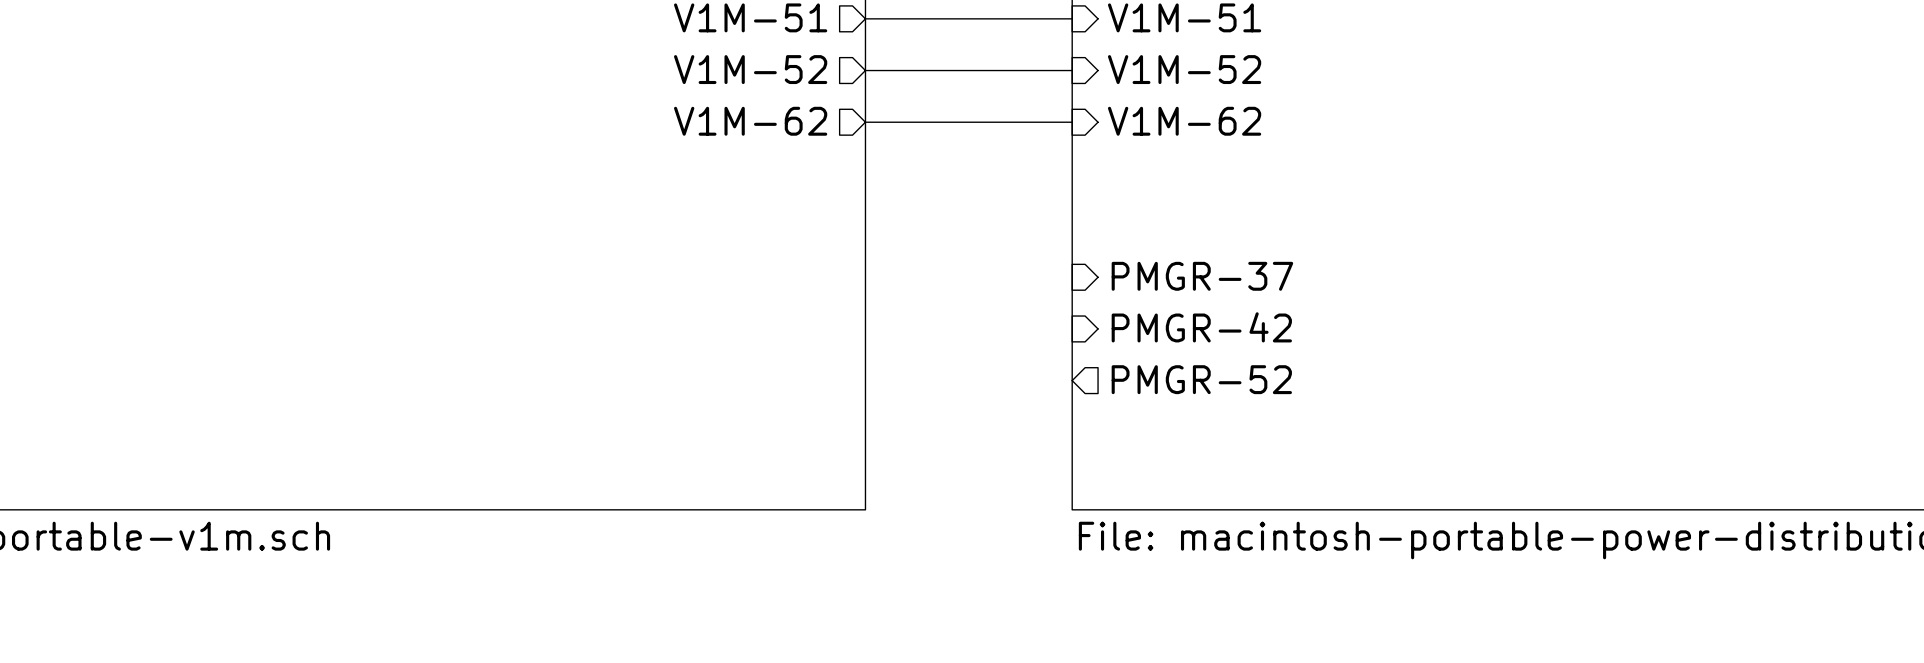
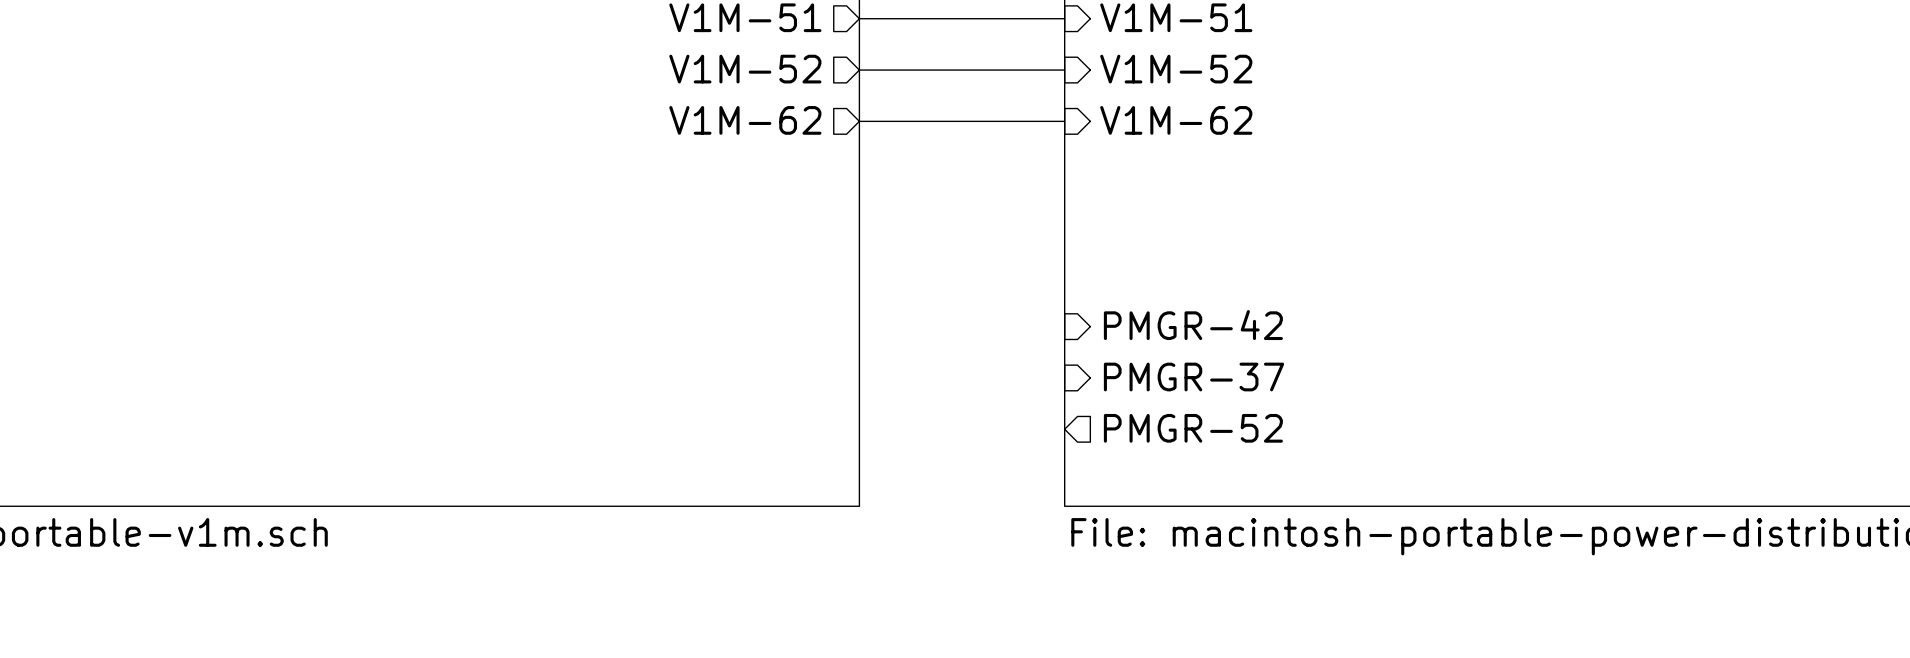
sheet pin: PMGR-37 (1202, 276) -> none
sheet pin shape: output (1201, 379) -> input (1193, 377)
sheet pin: PMGR-52 (1201, 379) -> PMGR-37 (1193, 377)
sheet pin: none -> PMGR-52 (1193, 428)

